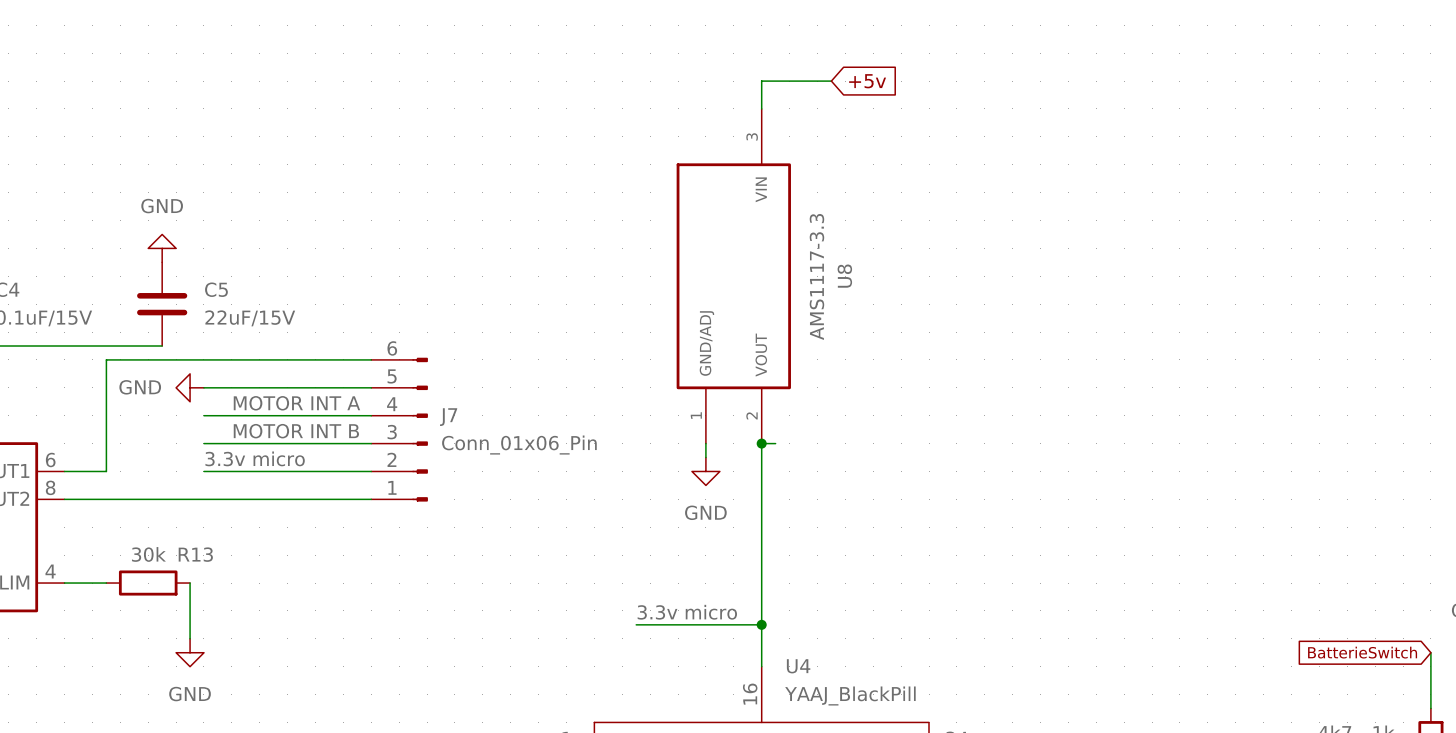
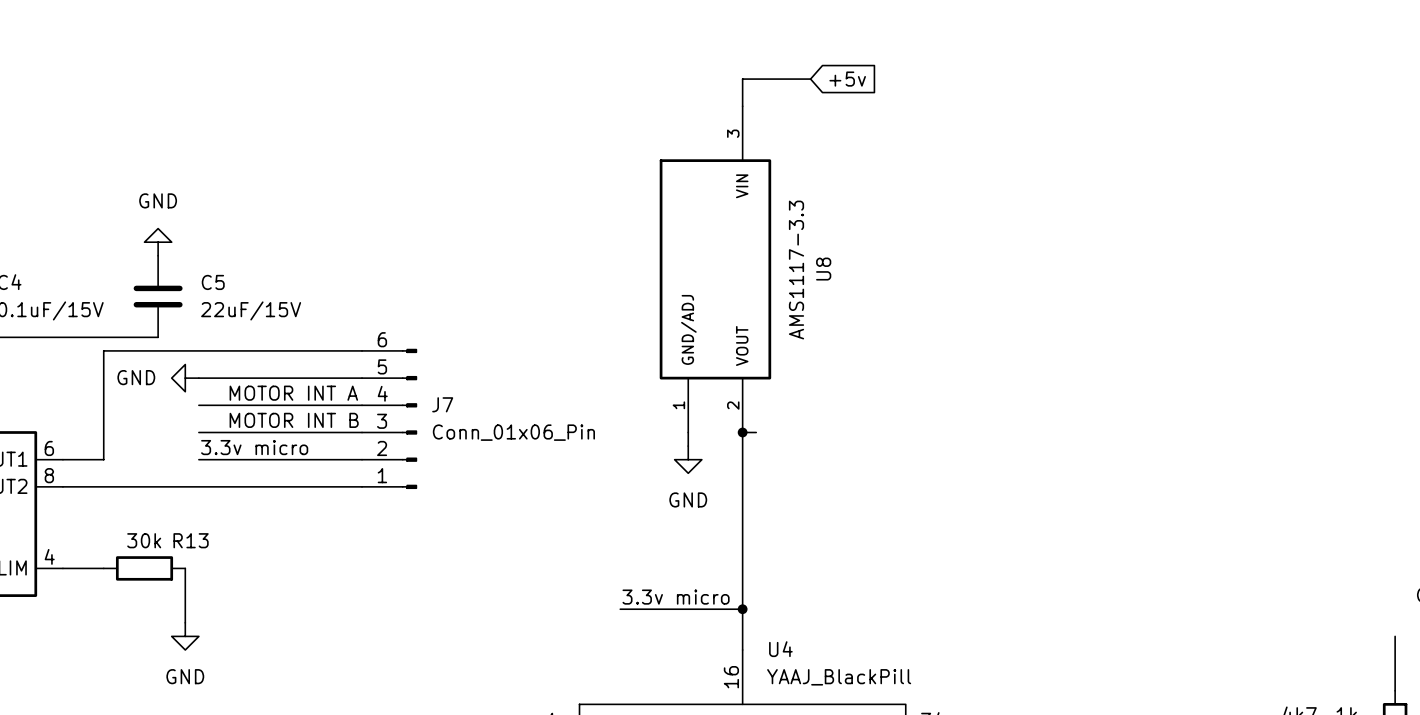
global label: BatterieSwitch (1362, 652) -> none

